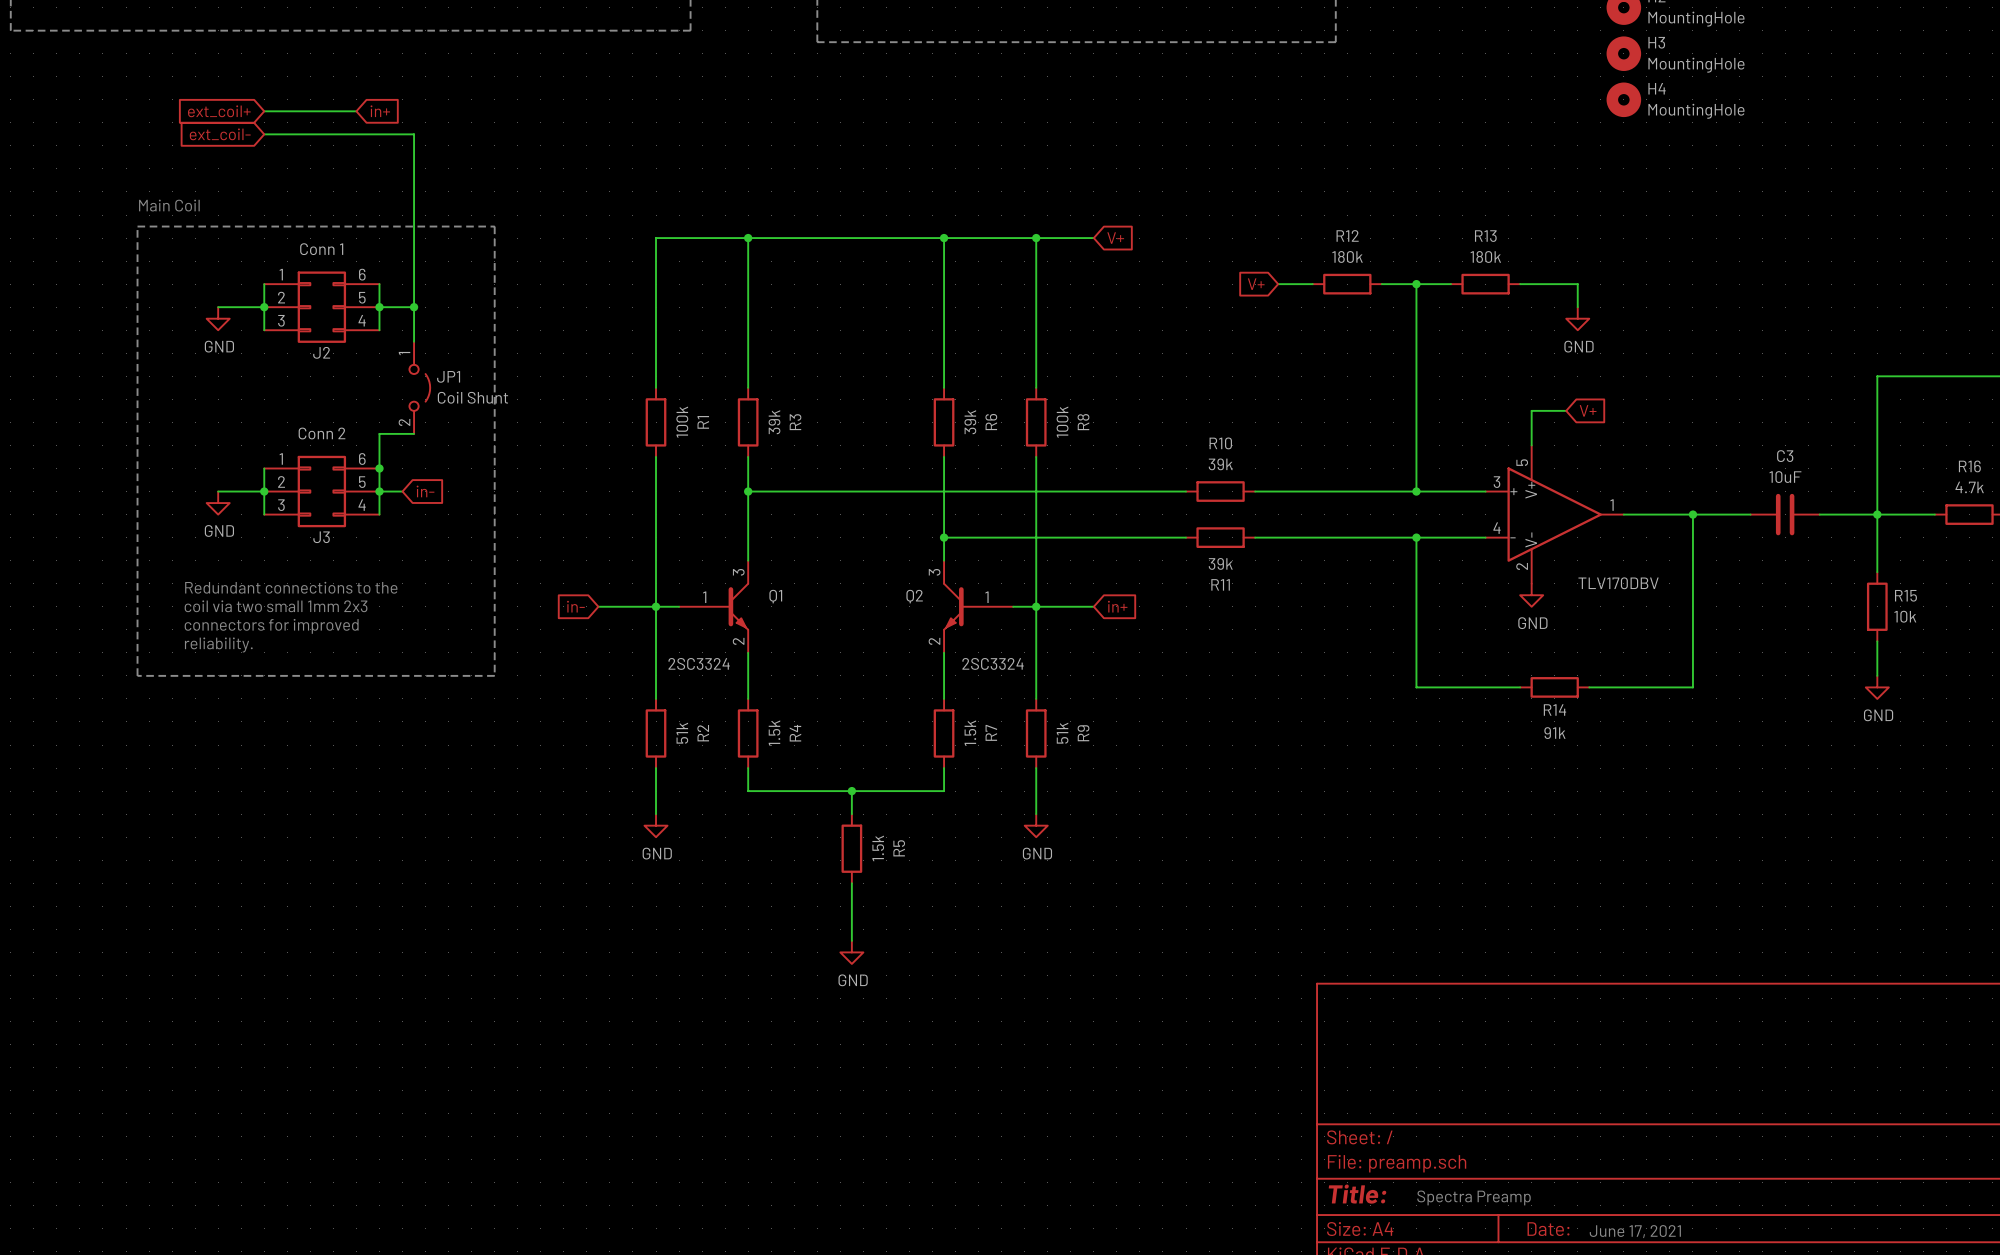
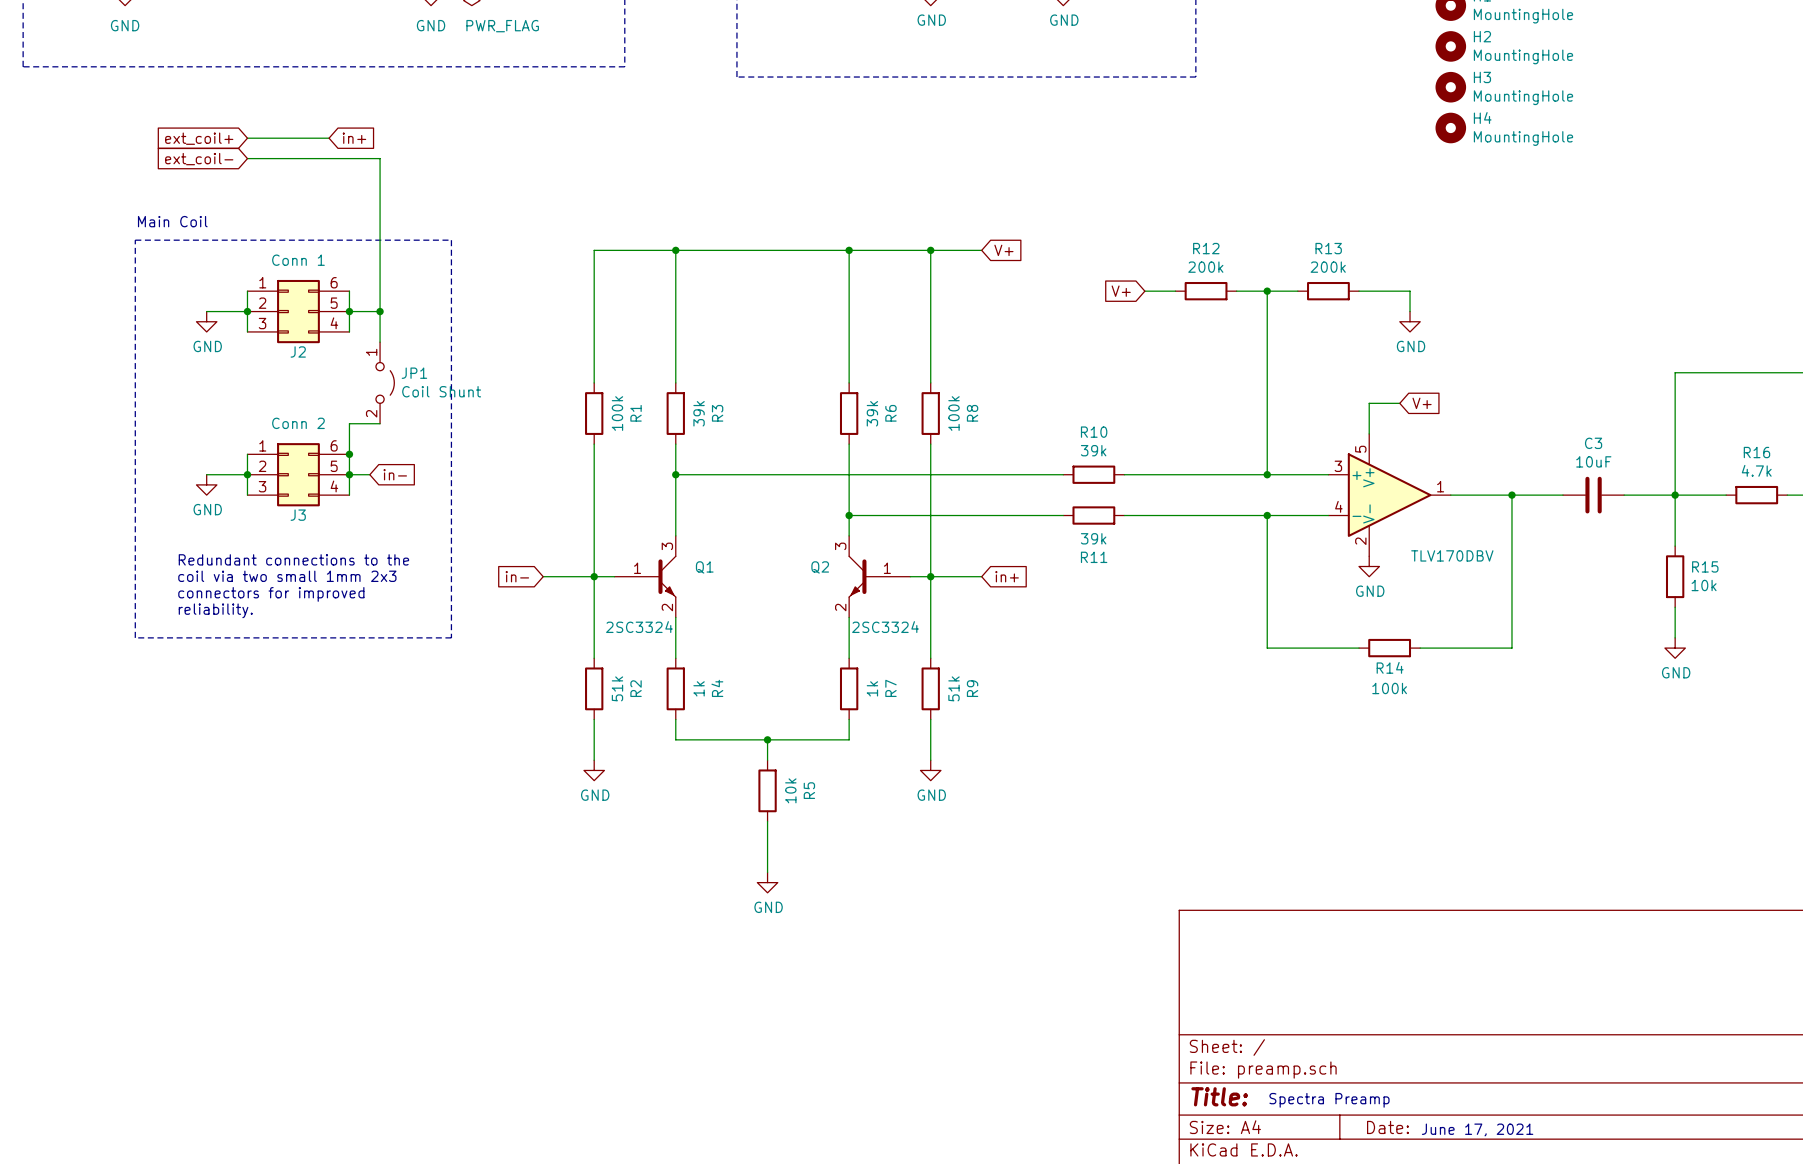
R12 value: 180k (1347, 256) -> 200k (1205, 267)
R13 value: 180k (1485, 256) -> 200k (1328, 267)
R4 value: 1.5k (774, 733) -> 1k (699, 688)
R7 value: 1.5k (970, 733) -> 1k (872, 688)
R14 value: 91k (1554, 733) -> 100k (1389, 688)
R5 value: 1.5k (878, 848) -> 10k (790, 790)

